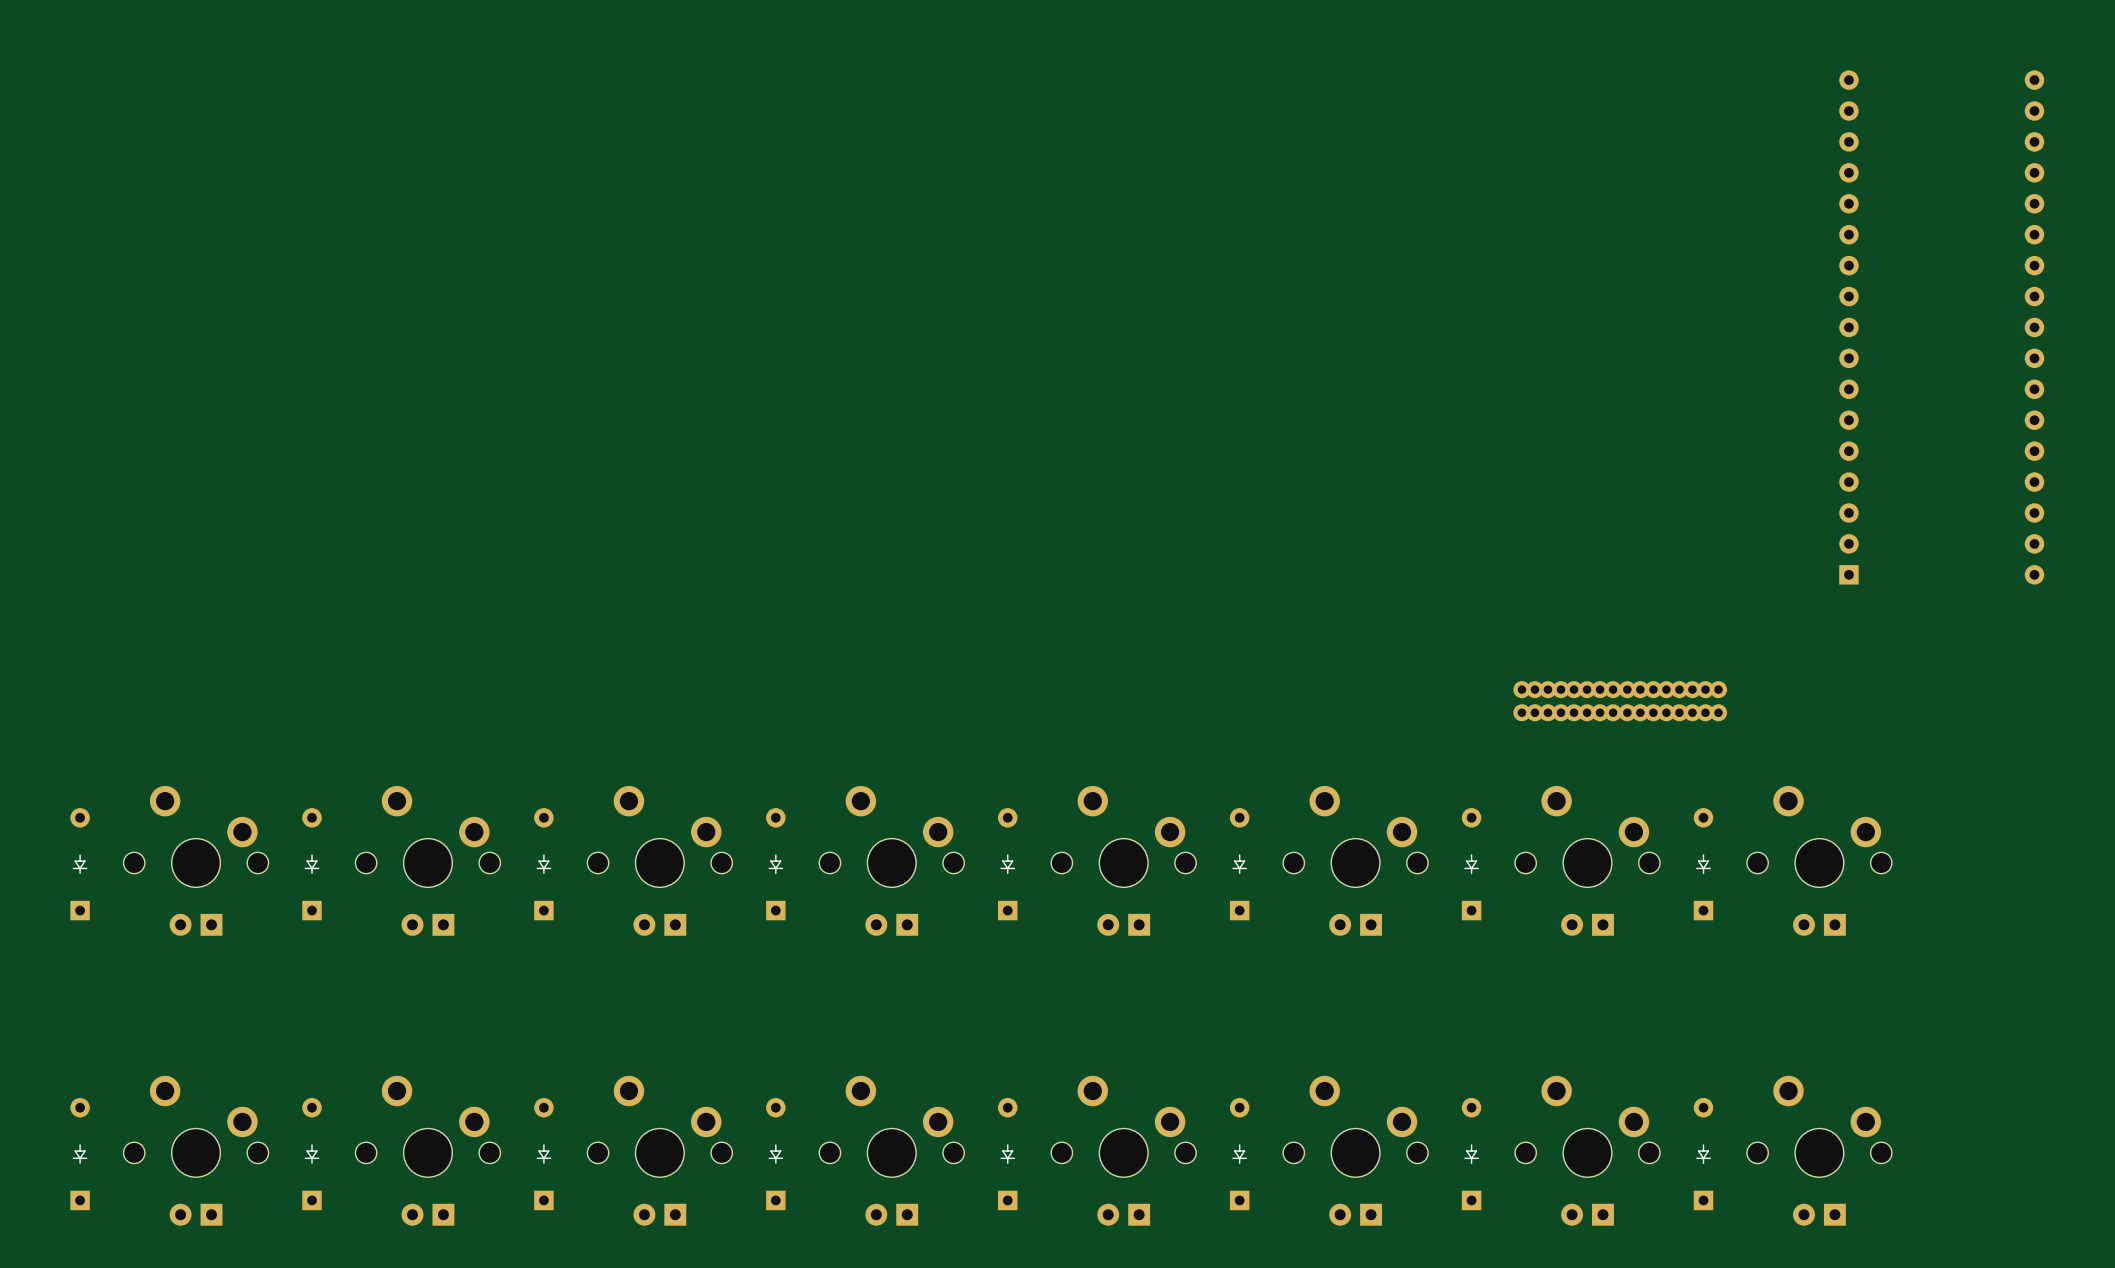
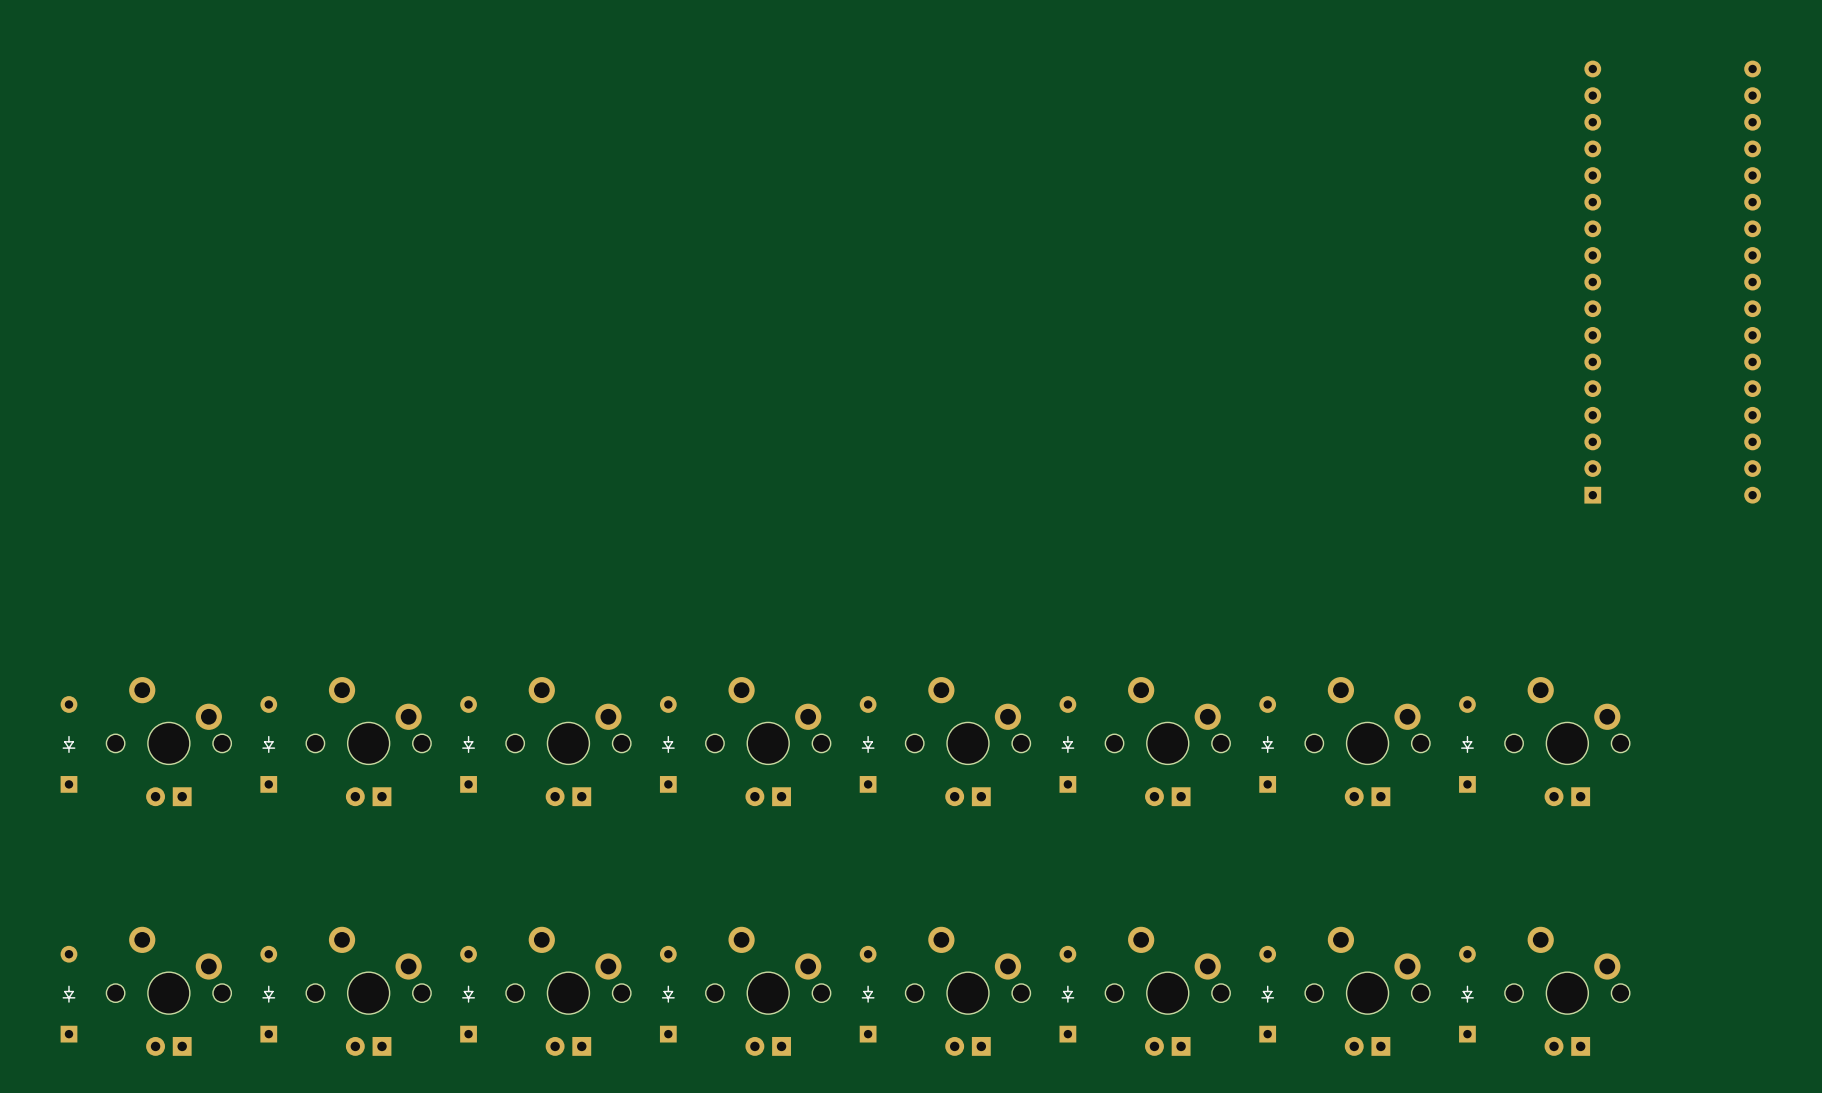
part: (1521, 701) -> none
part: (1534, 701) -> none
part: (1547, 701) -> none
part: (1560, 701) -> none
part: (1574, 701) -> none
part: (1587, 701) -> none
part: (1600, 701) -> none
part: (1613, 701) -> none
part: (1627, 701) -> none
part: (1640, 701) -> none
part: (1653, 701) -> none
part: (1666, 701) -> none
part: (1679, 701) -> none
part: (1692, 701) -> none
part: (1705, 701) -> none
part: (1718, 701) -> none

